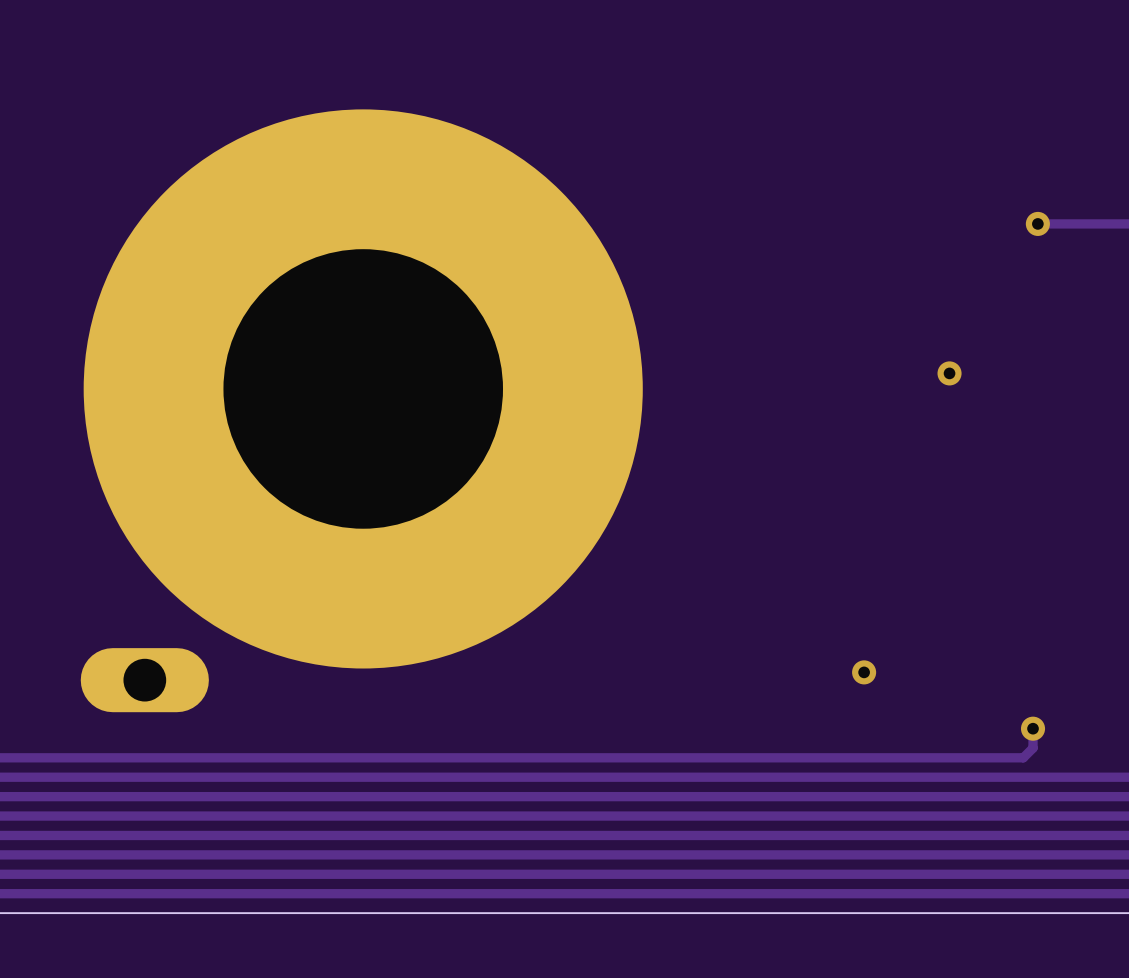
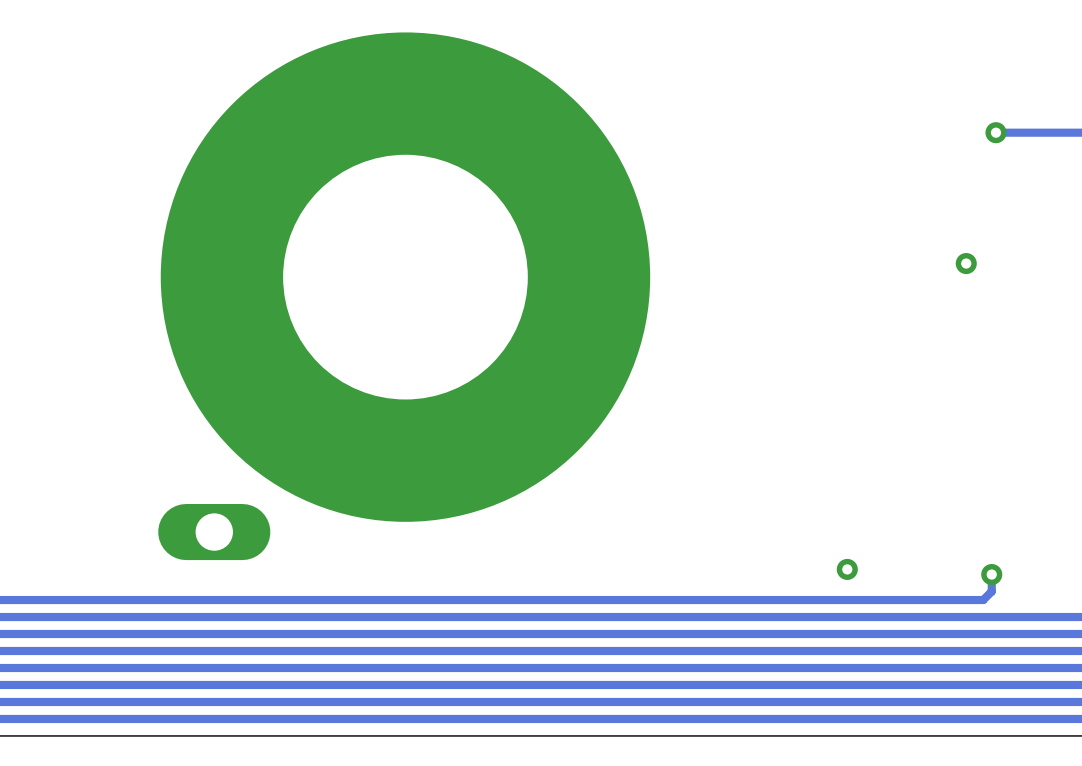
via position: (949, 373) -> (966, 263)
via position: (864, 672) -> (847, 569)

